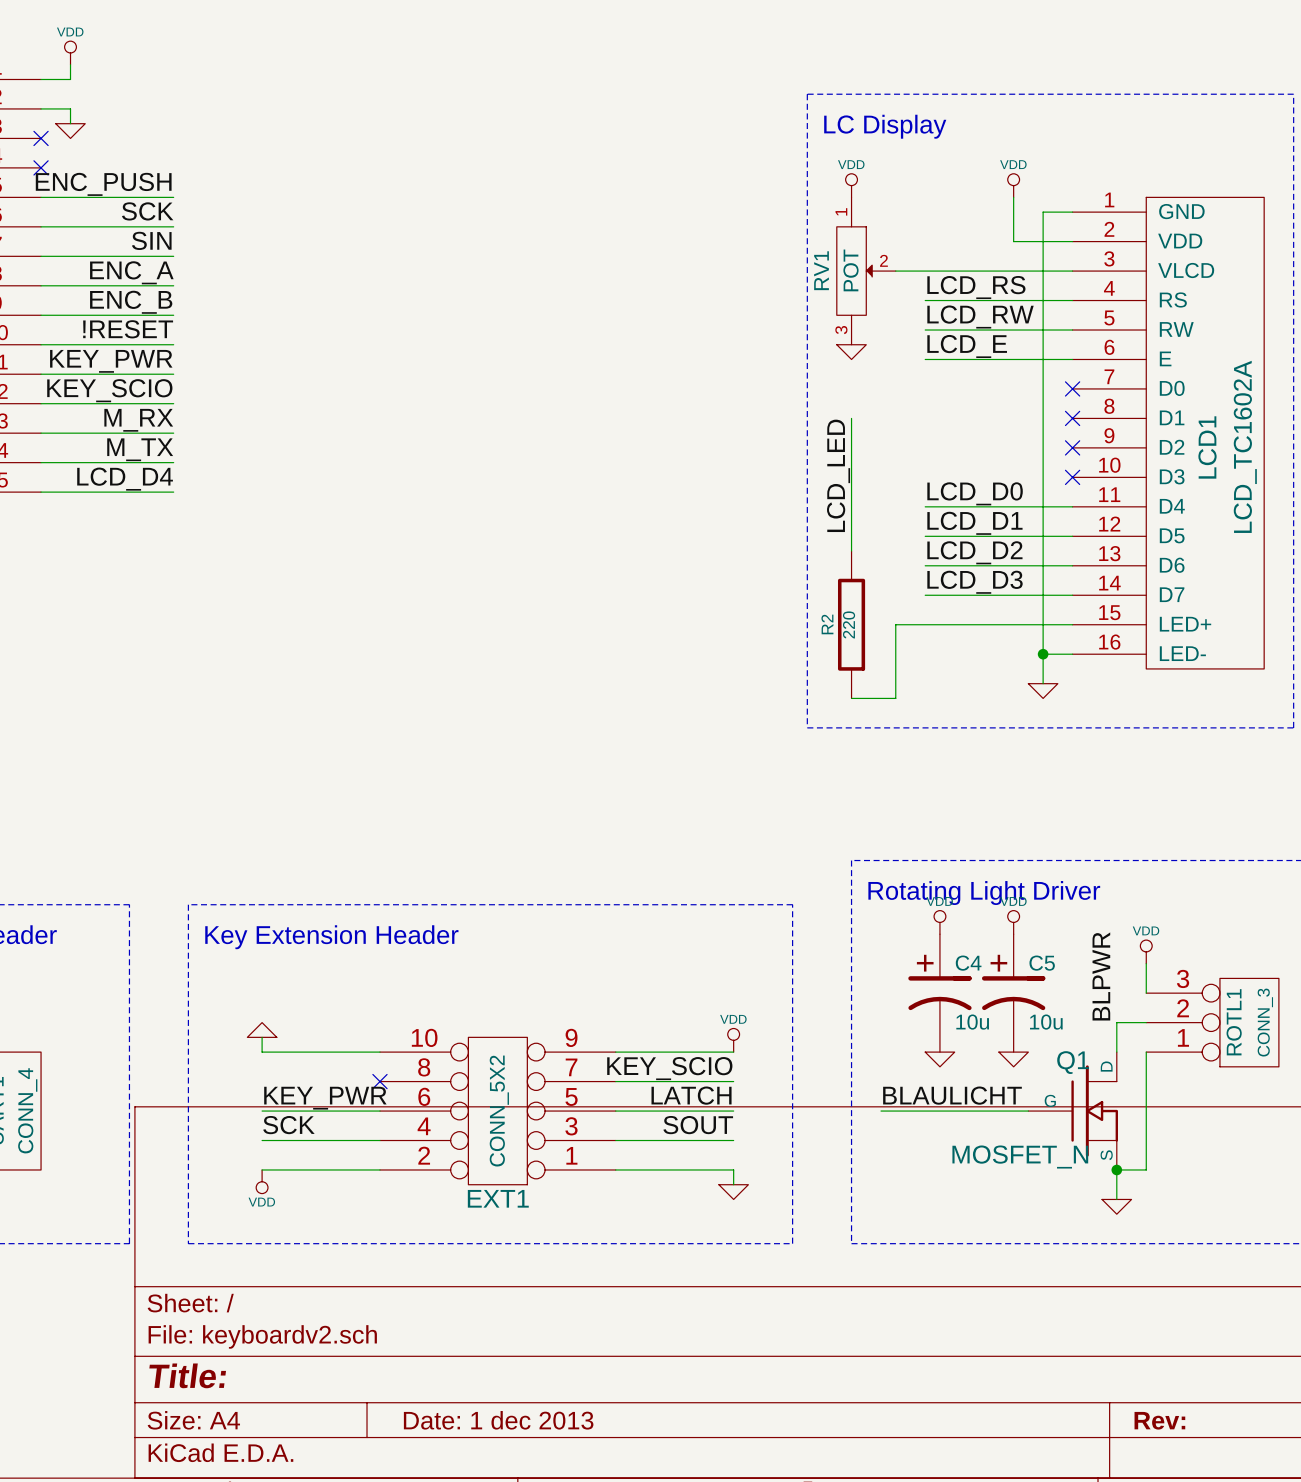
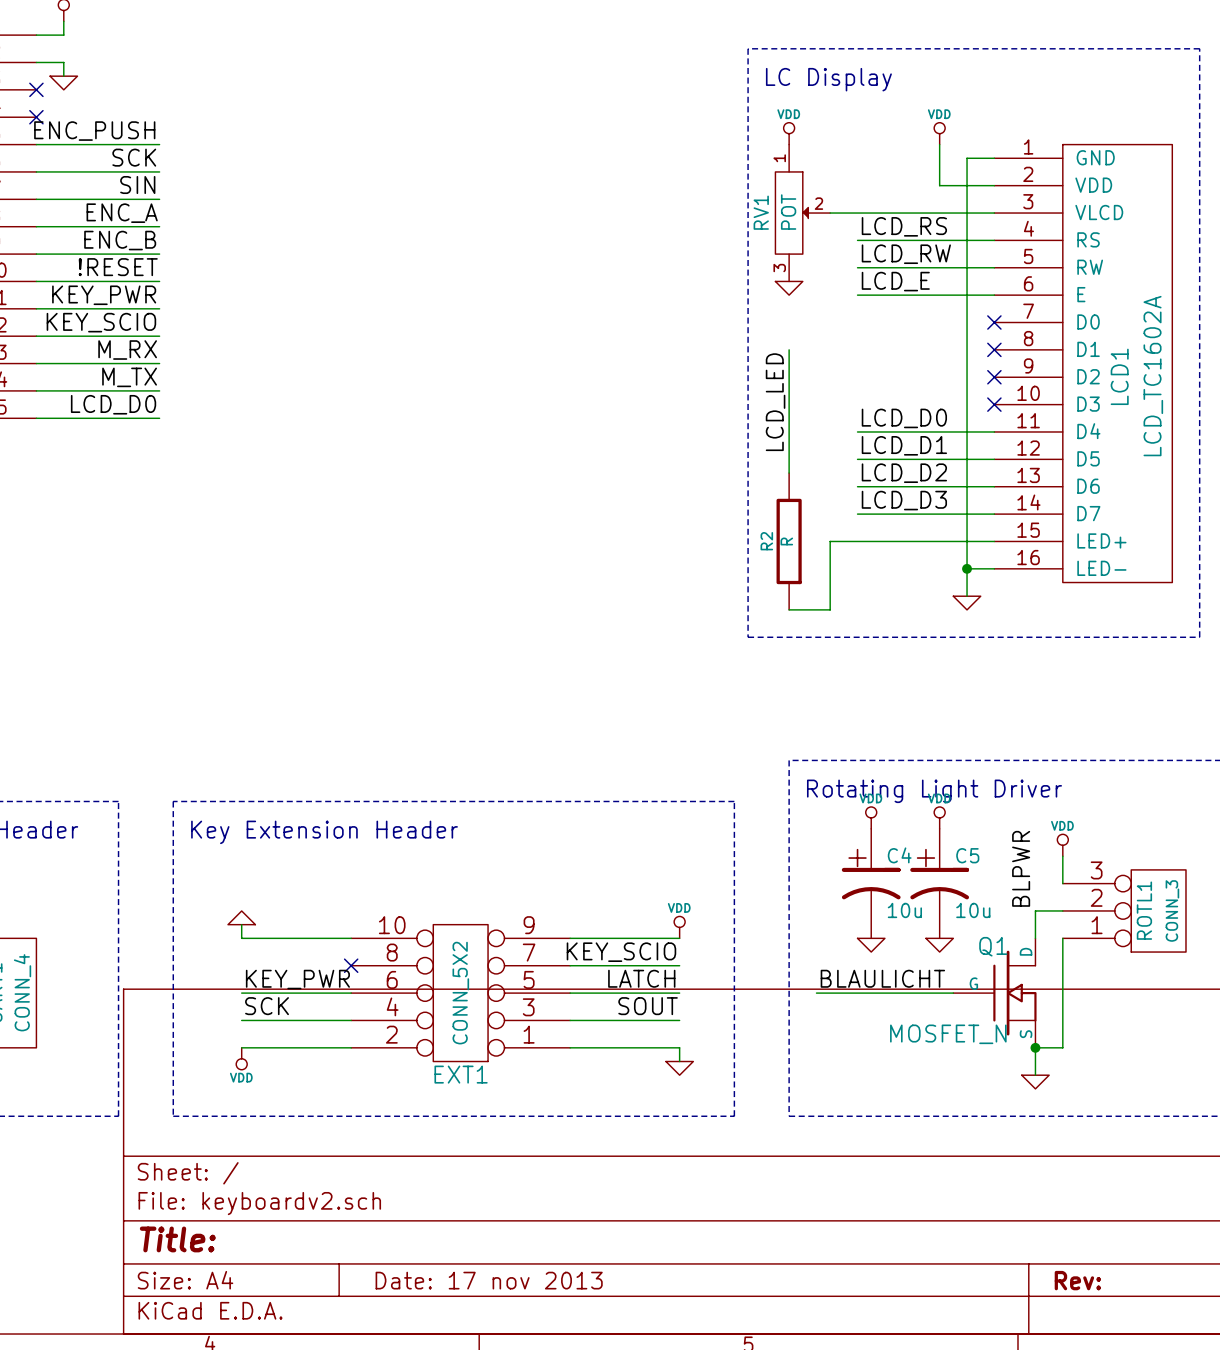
label: LCD_D4 (125, 479) -> LCD_D0 (113, 404)
R2 value: 220 (849, 624) -> R (786, 541)
title block: Date: 1 dec 2013 (498, 1420) -> Date: 17 nov 2013 (489, 1280)

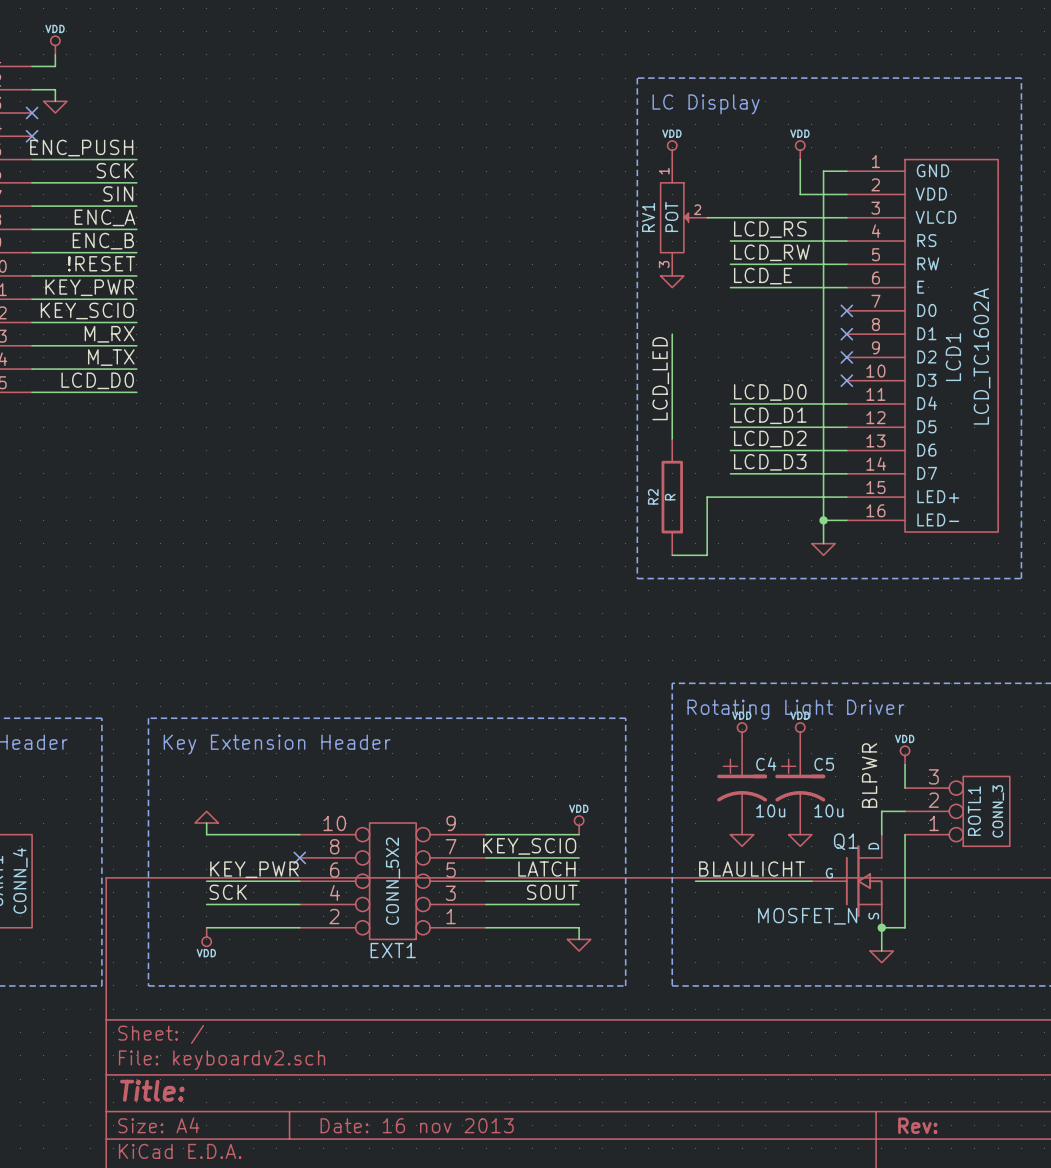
title block: Date: 17 nov 2013 (489, 1280) -> Date: 16 nov 2013 (417, 1125)

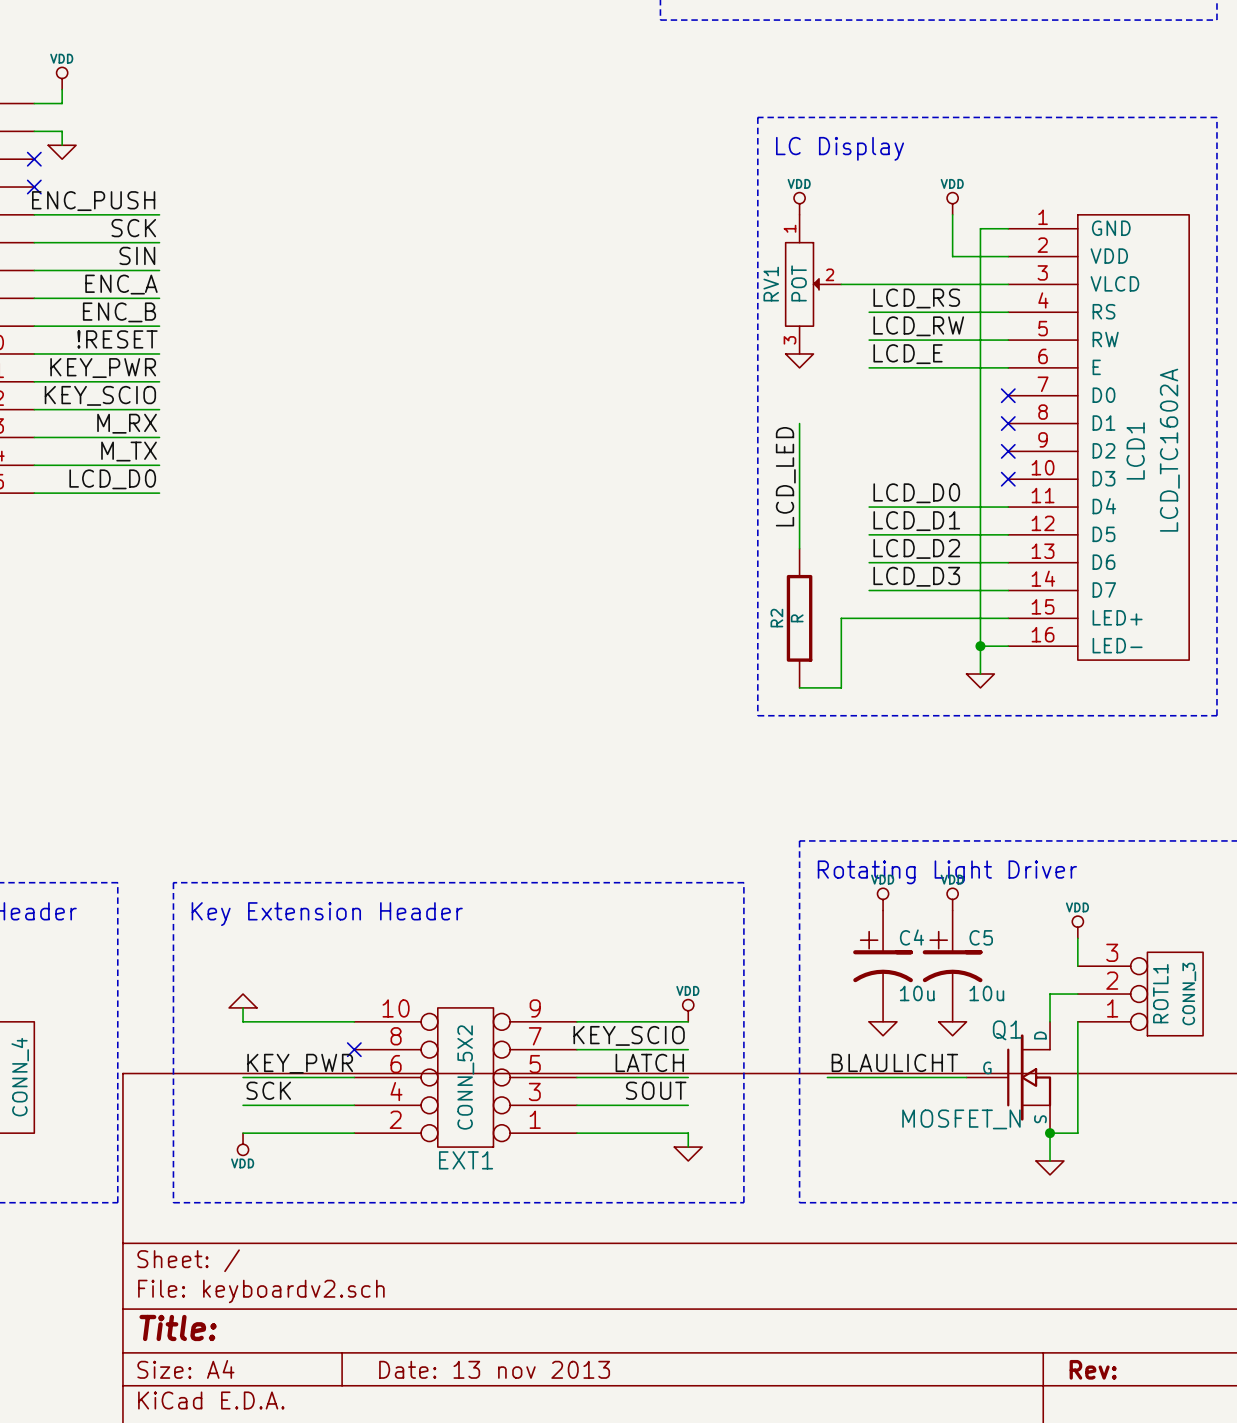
label: BLPWR (869, 775) -> none
title block: Date: 16 nov 2013 (417, 1125) -> Date: 13 nov 2013 (494, 1369)

